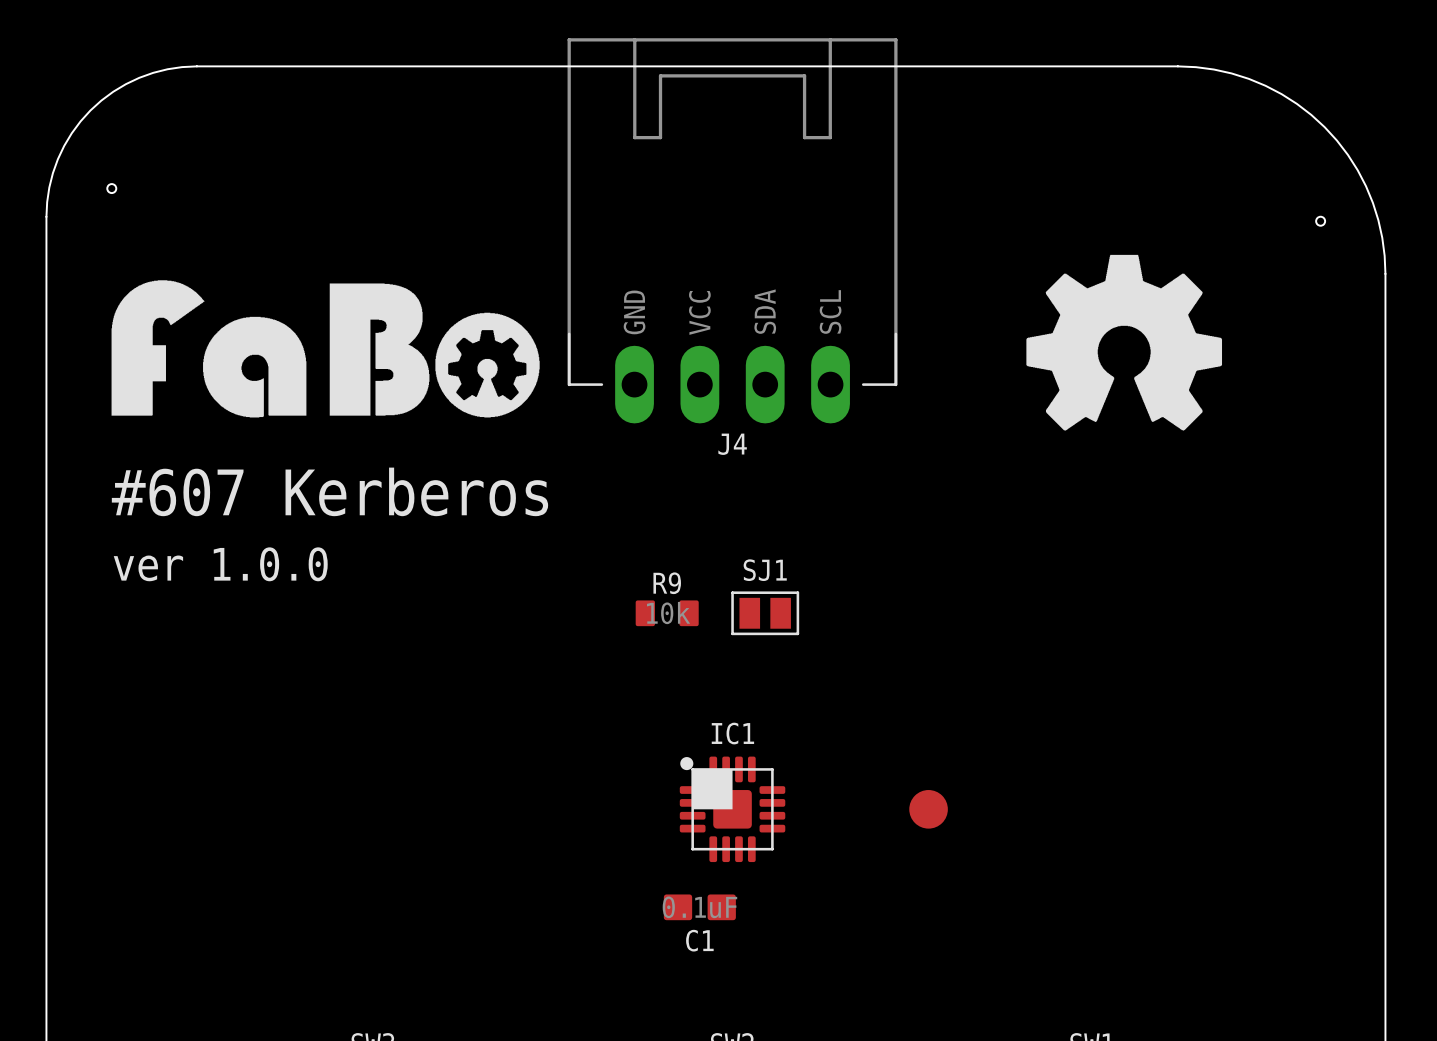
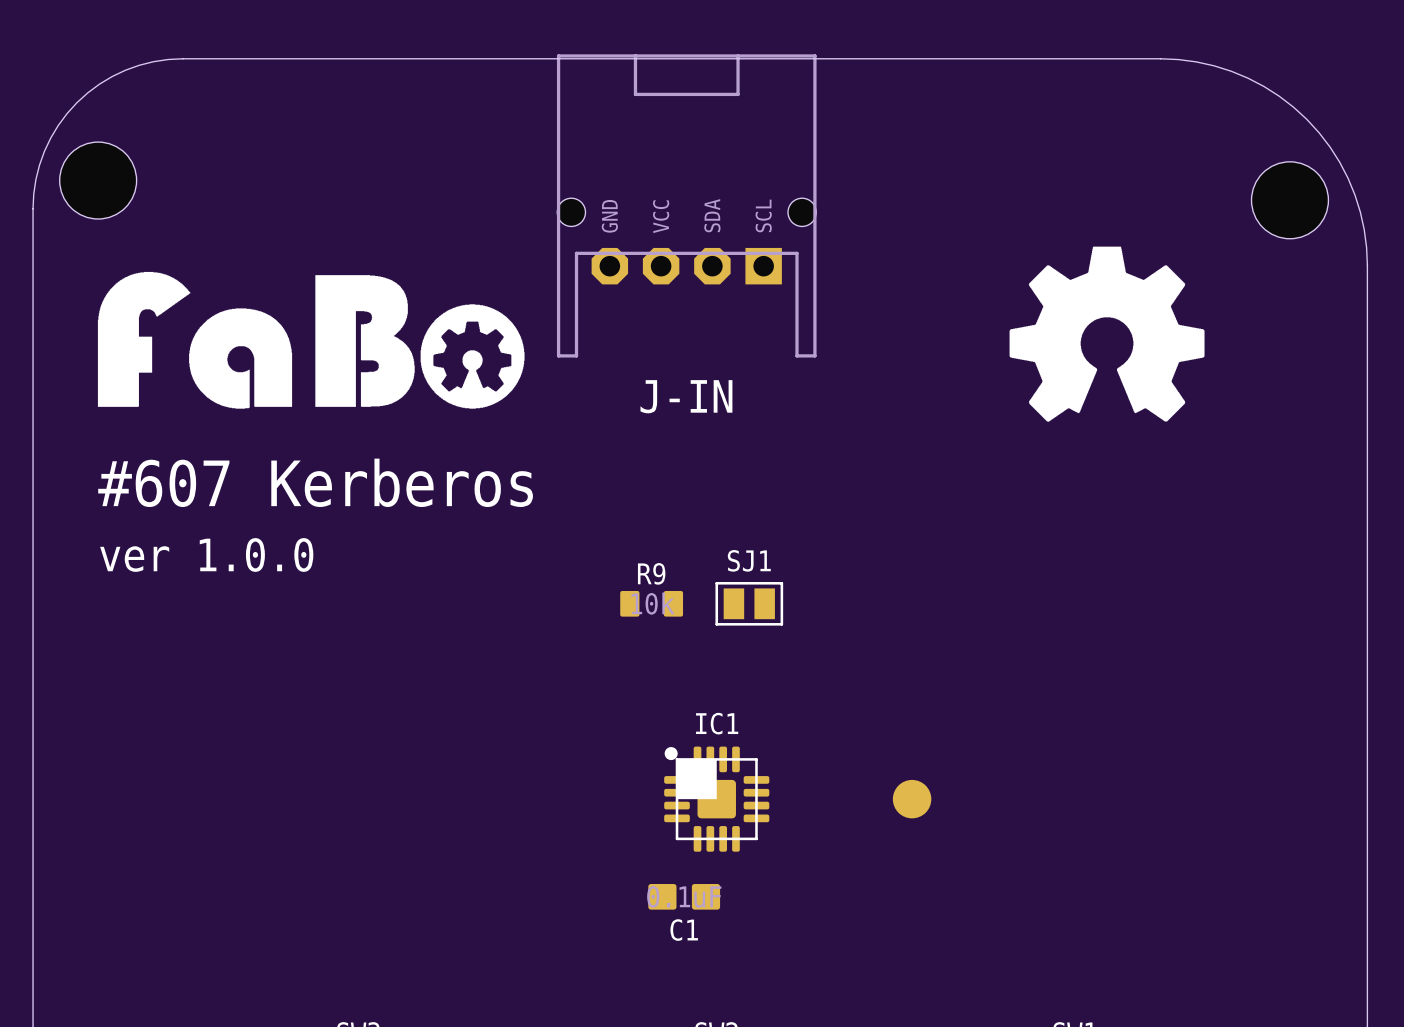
hole size: [107, 184, 117, 194] -> [59, 142, 137, 220]
J-IN: none -> (686, 205)
hole size: [1316, 216, 1326, 226] -> [1251, 161, 1329, 239]
J4: (732, 230) -> none

